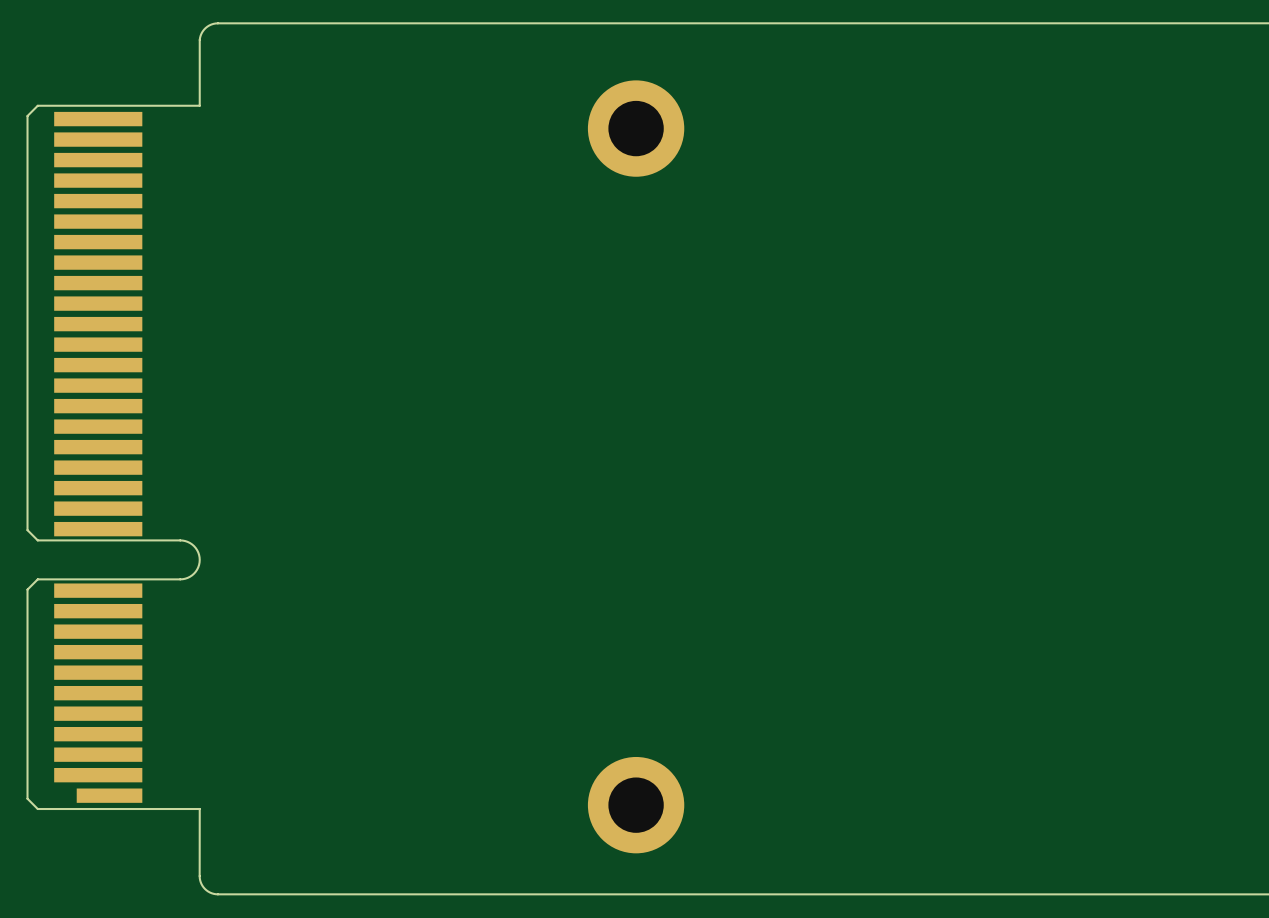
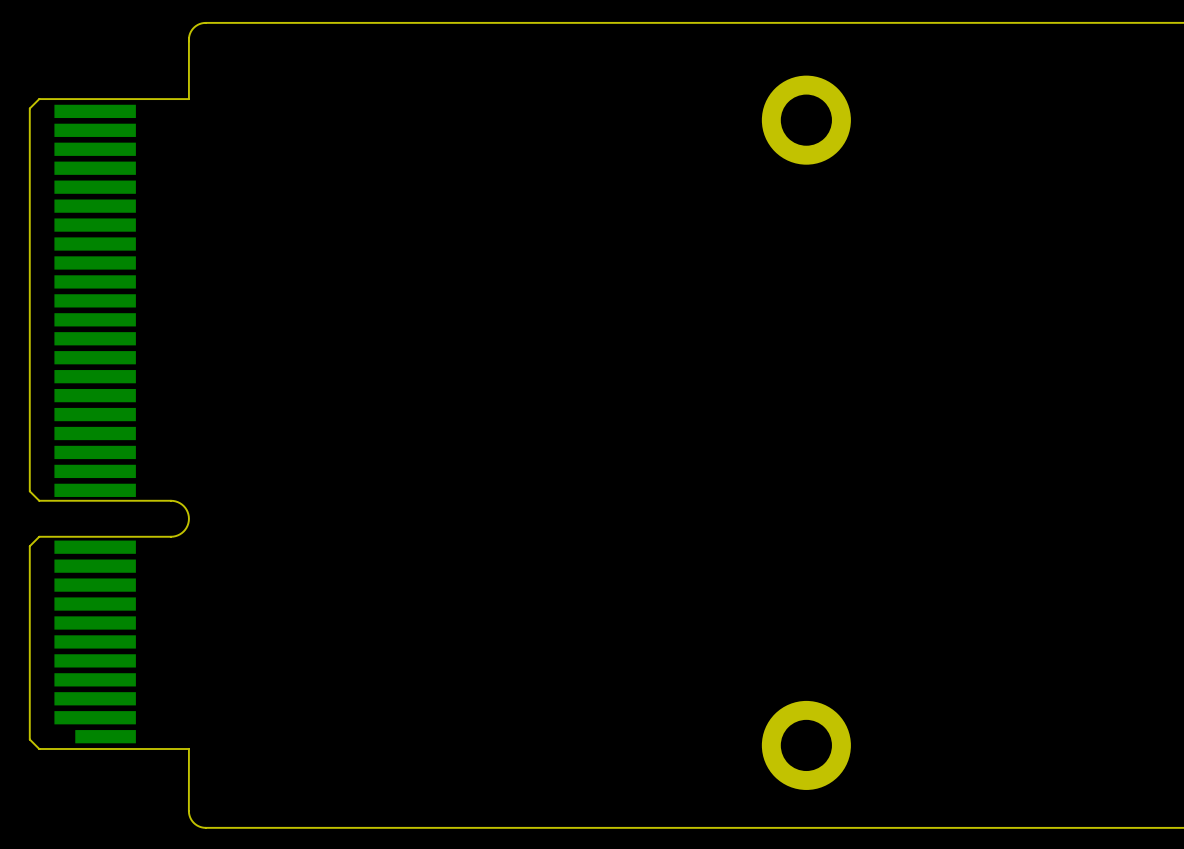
part position: (636, 128) -> (806, 120)
part position: (636, 805) -> (806, 745)

